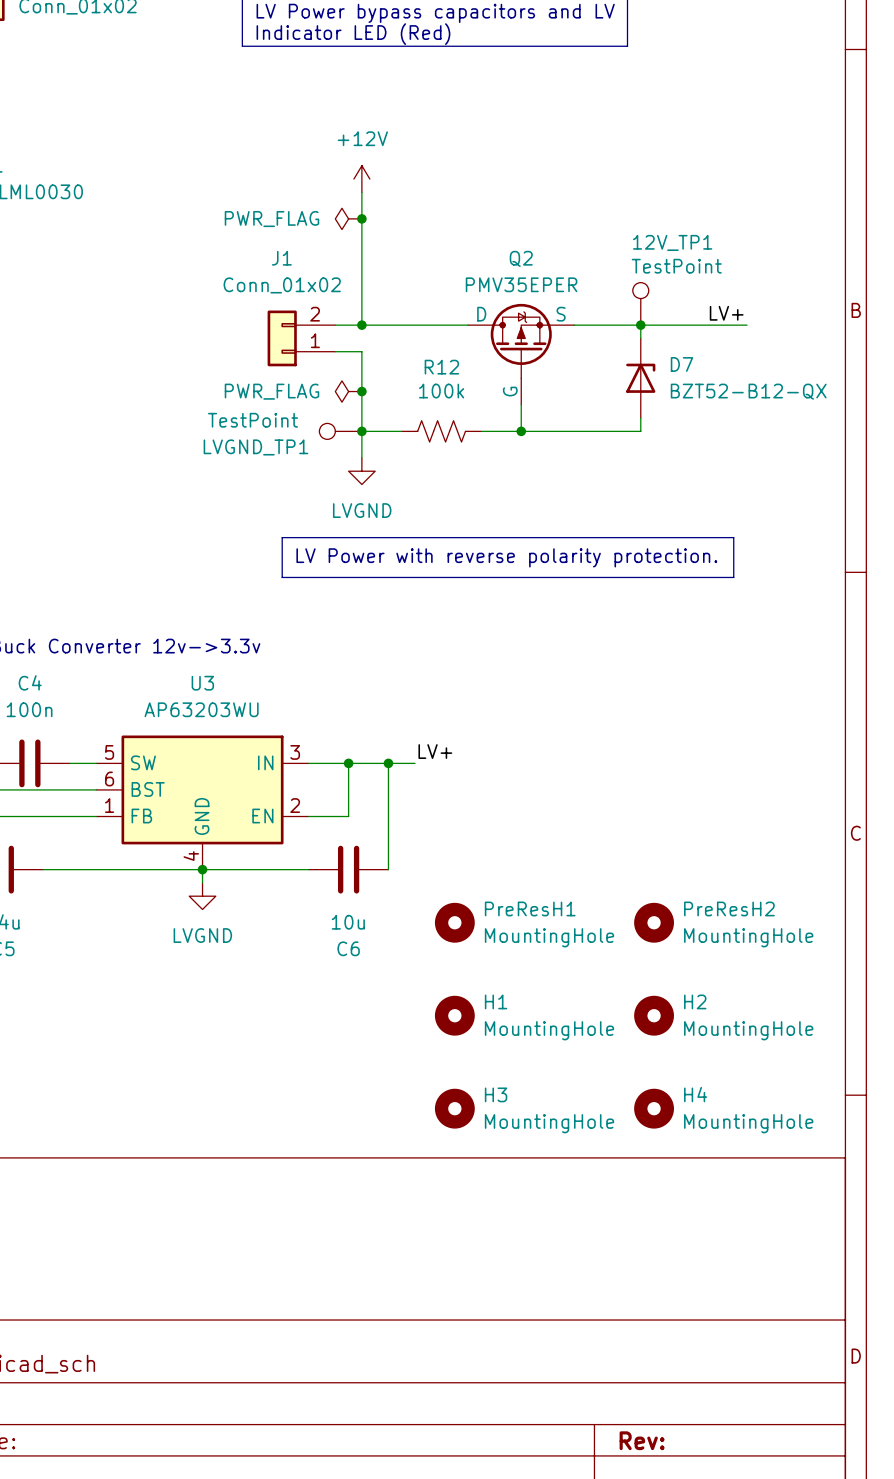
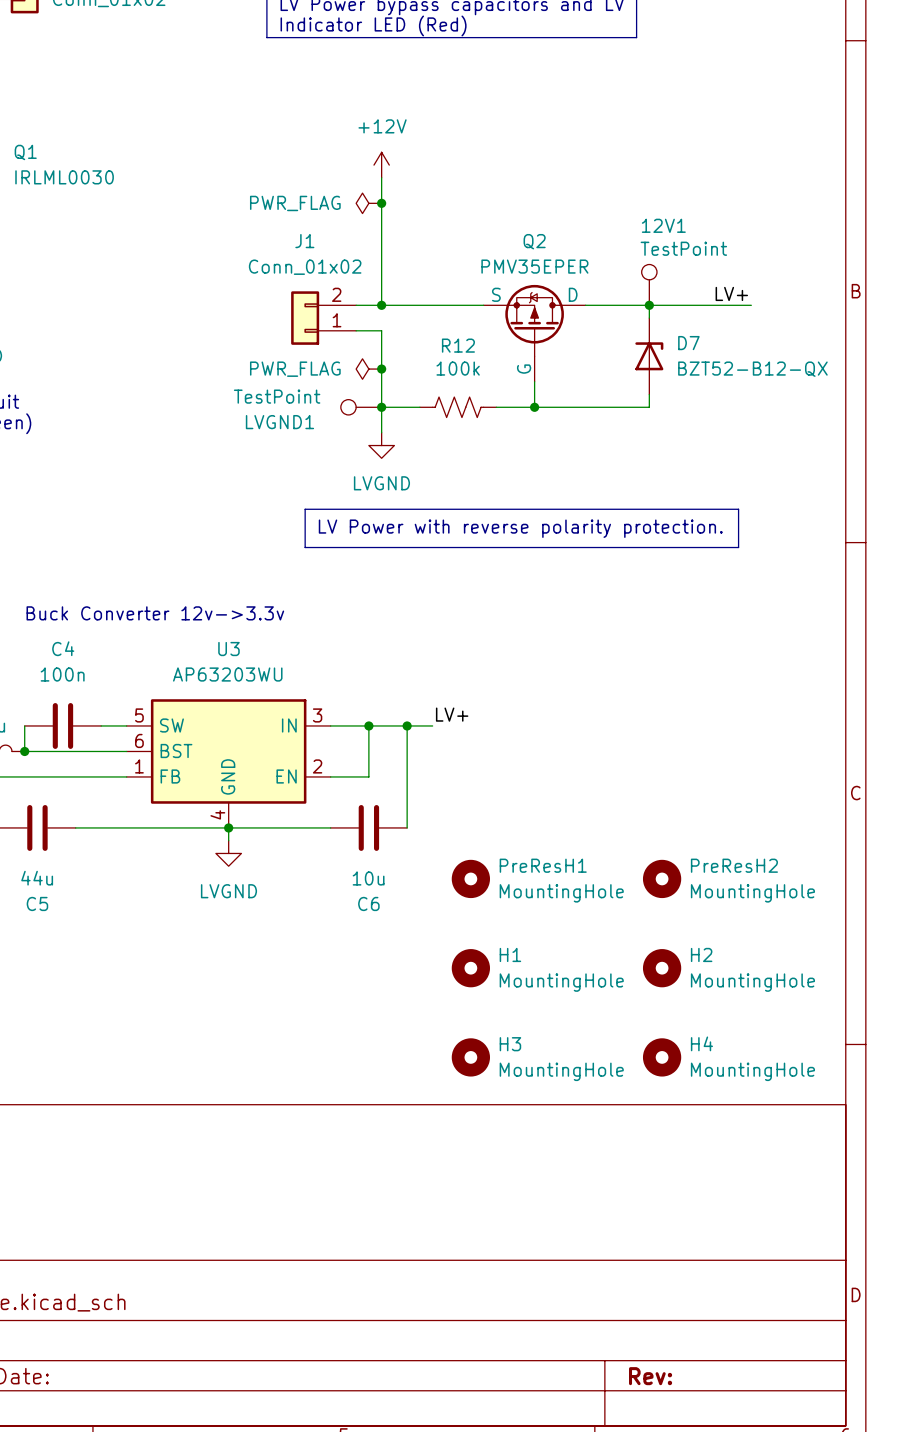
12V_TP1 name: 12V_TP1 (672, 242) -> 12V1 (663, 225)
Q2 flip: as is (521, 341) -> left-right (534, 320)
LVGND_TP1 name: LVGND_TP1 (255, 447) -> LVGND1 (279, 422)

